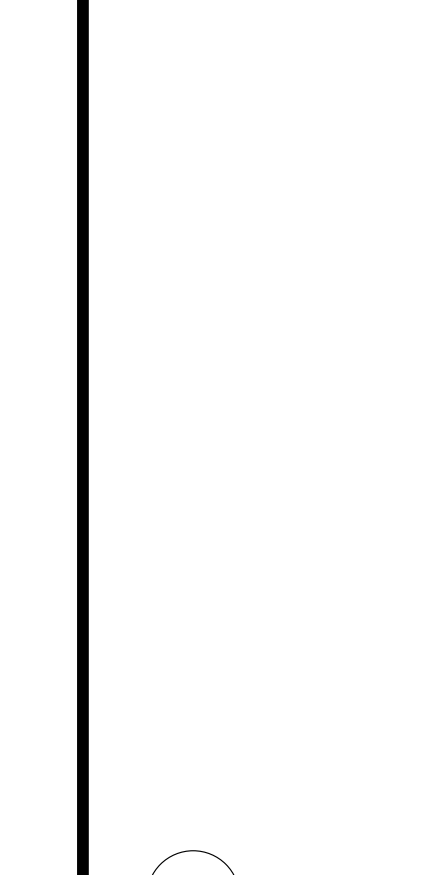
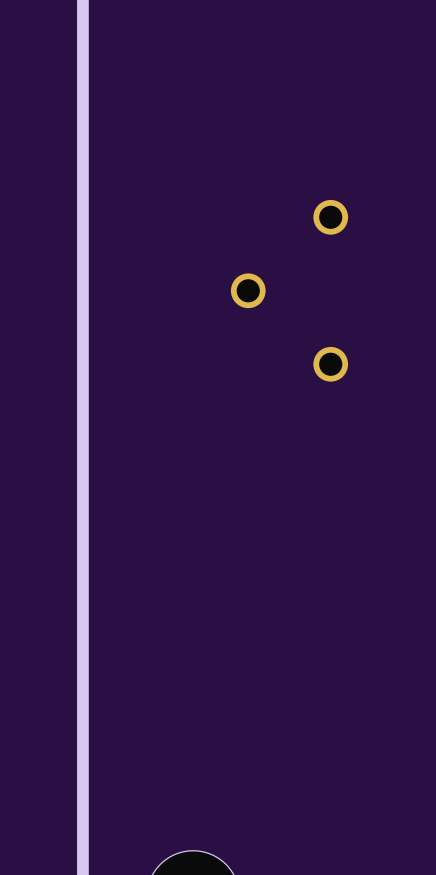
part: none -> (289, 290)

